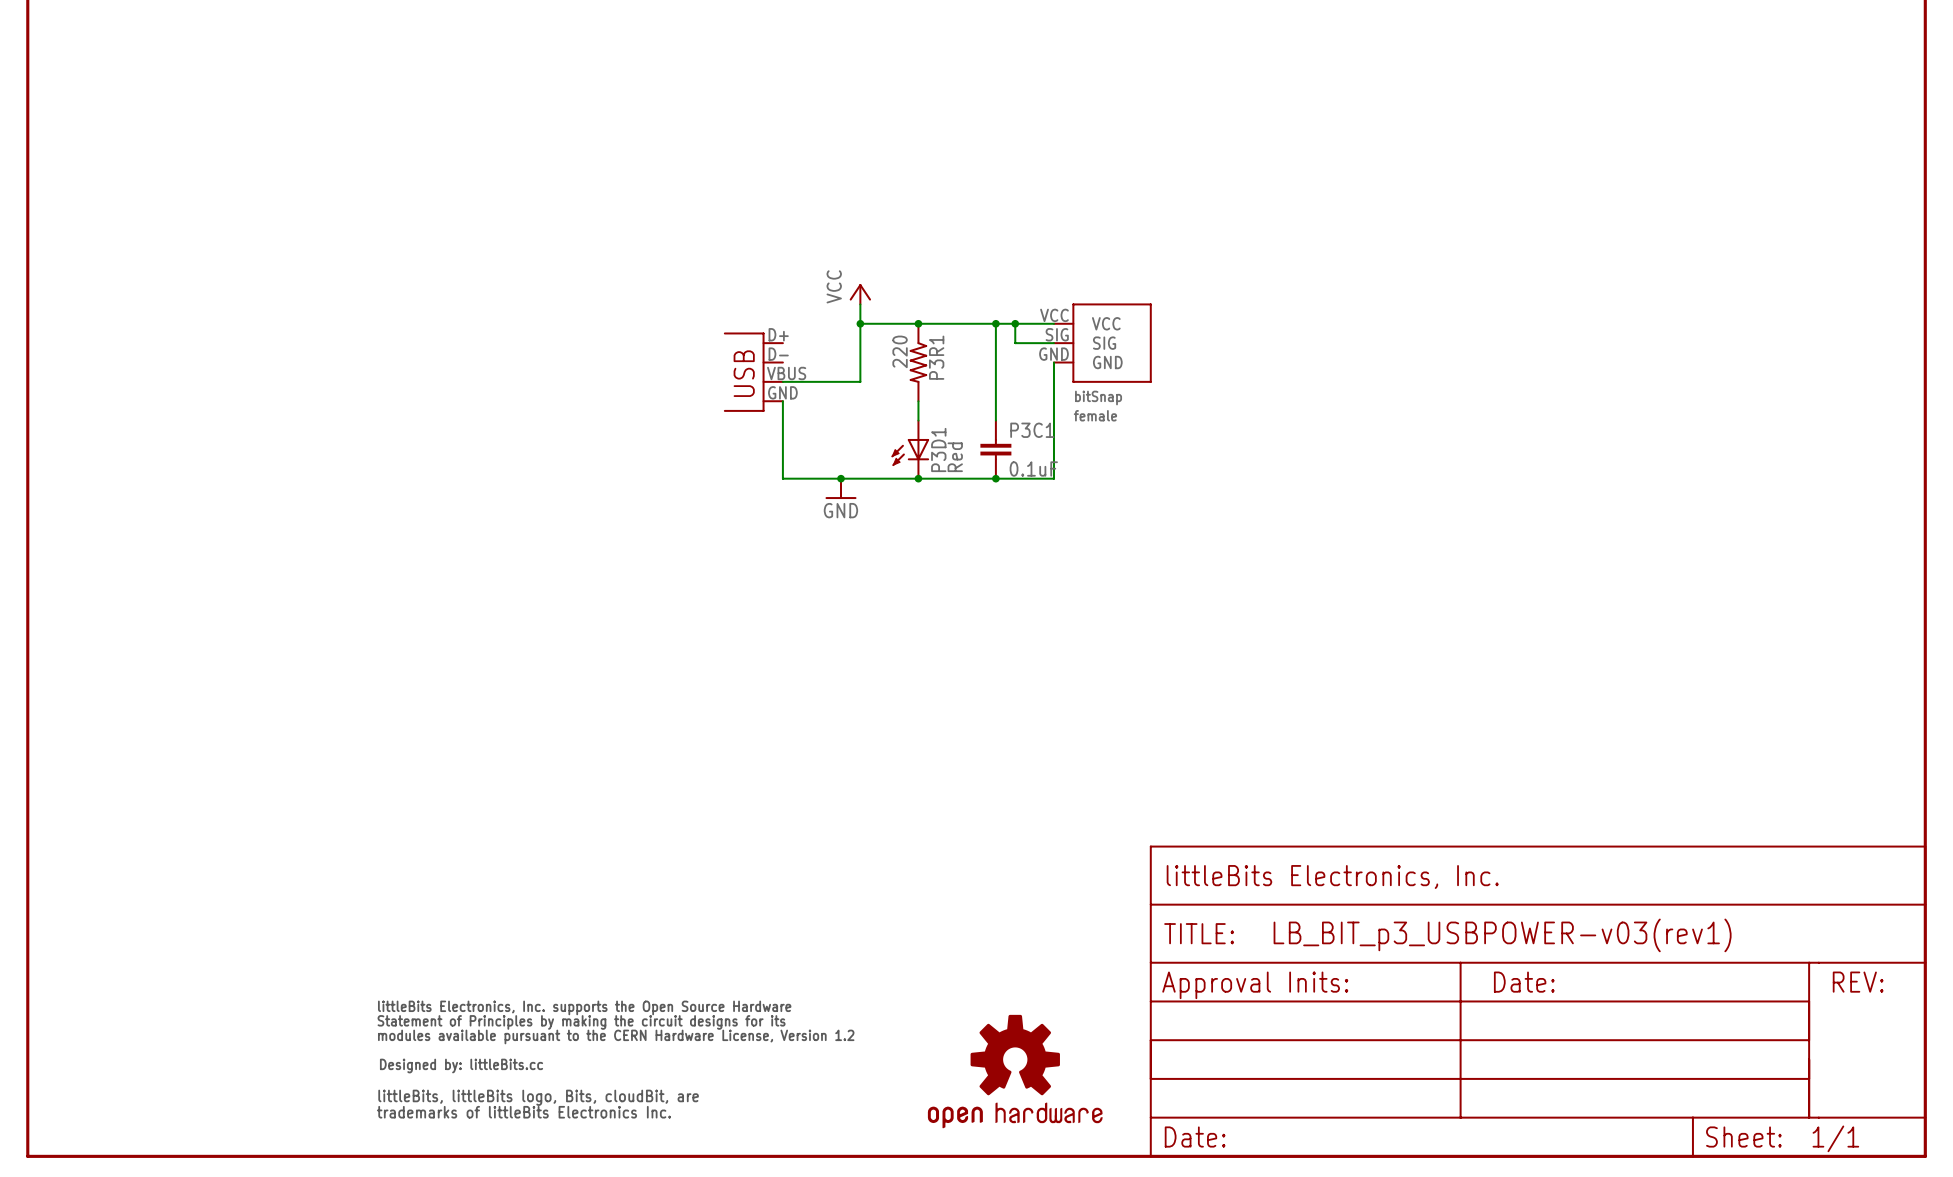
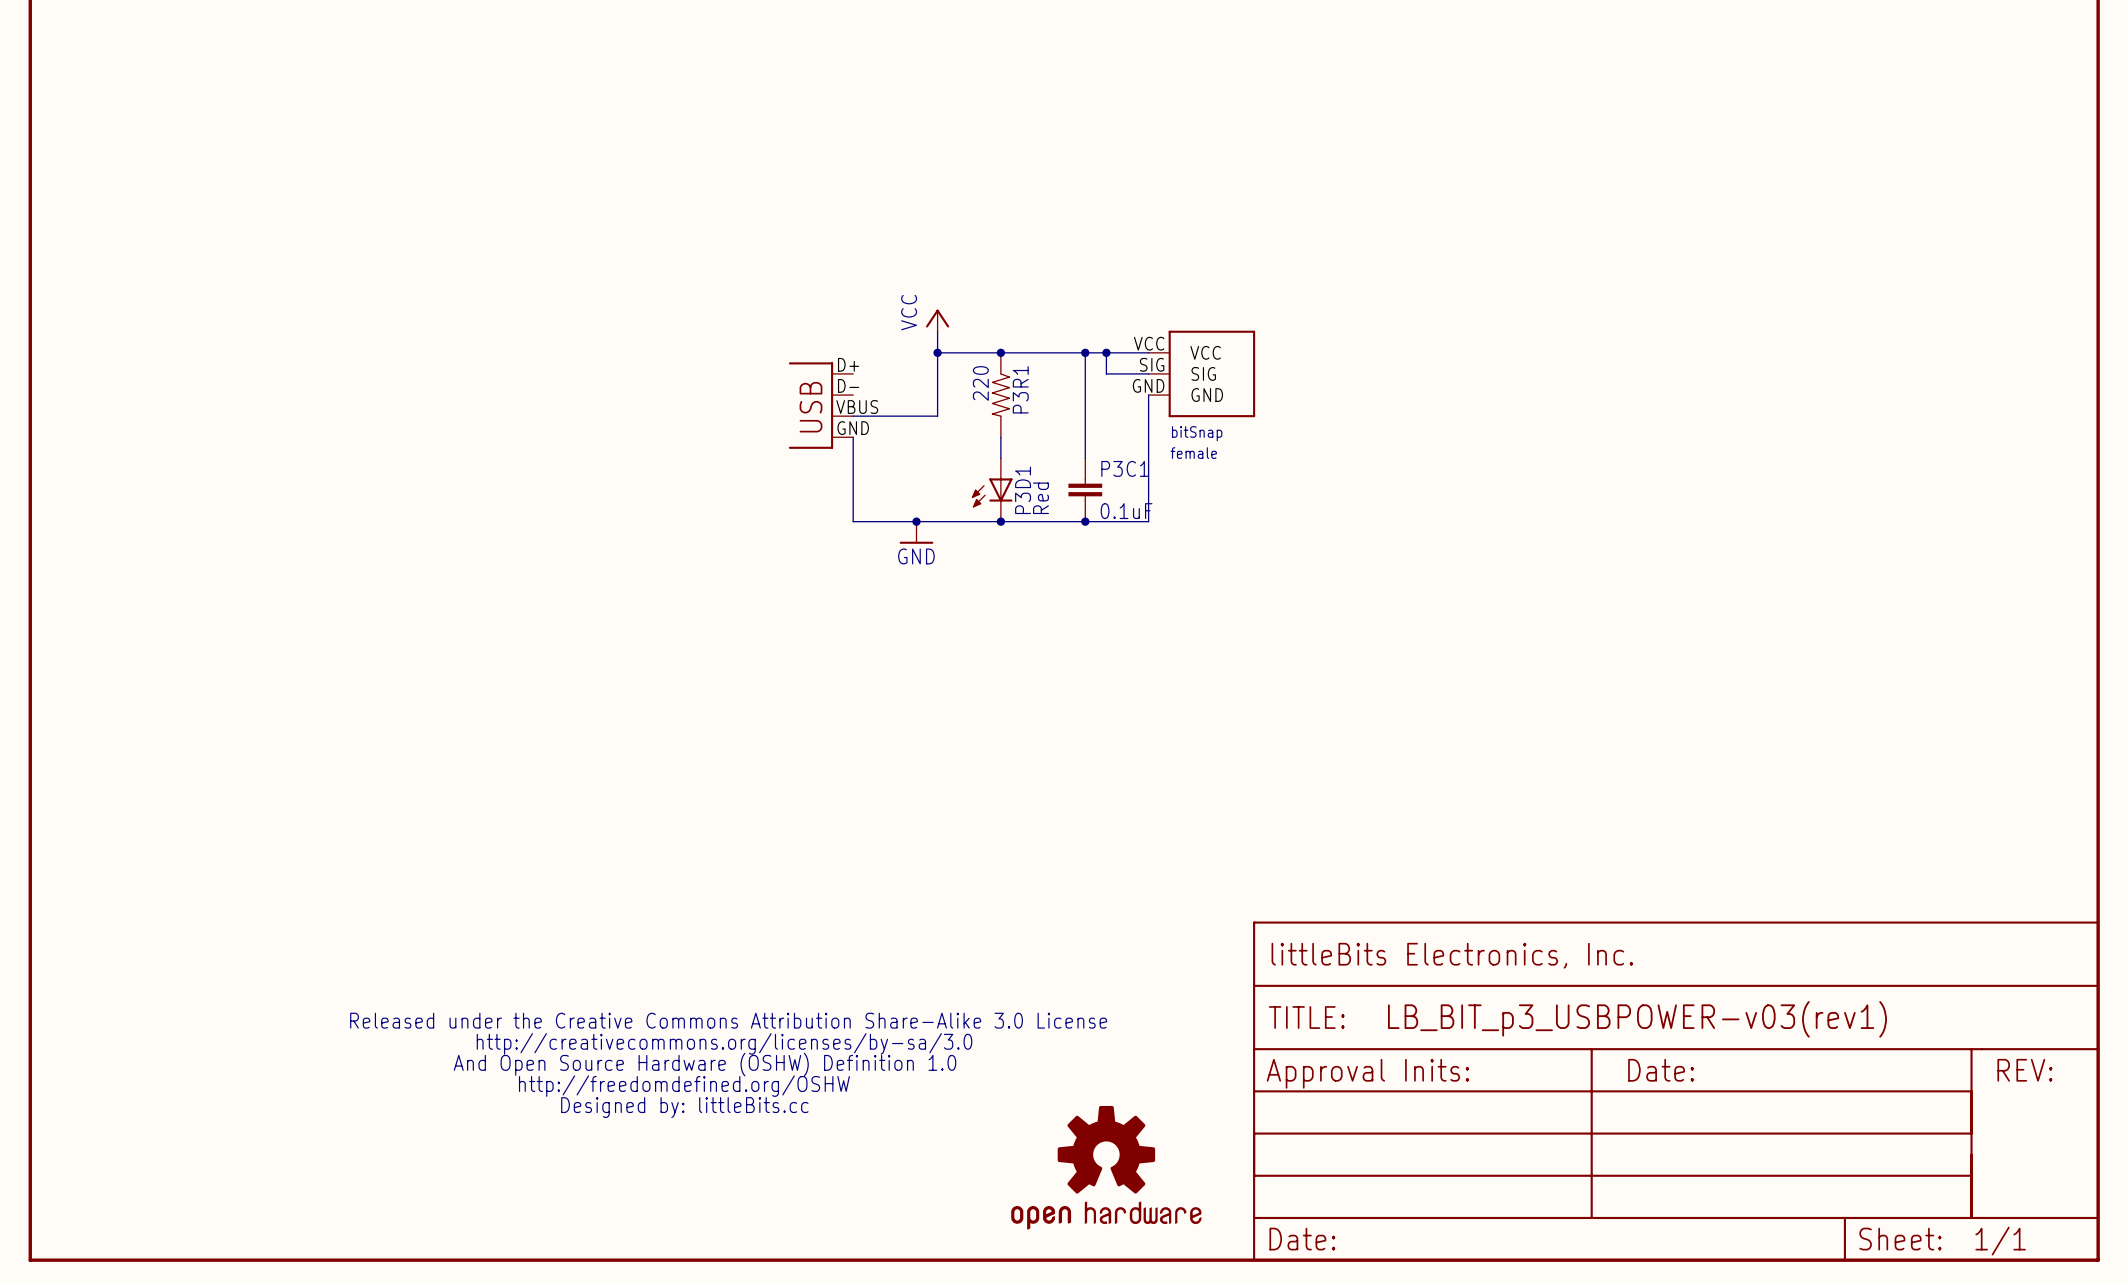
part: none -> (728, 1065)
part: (615, 1059) -> none

